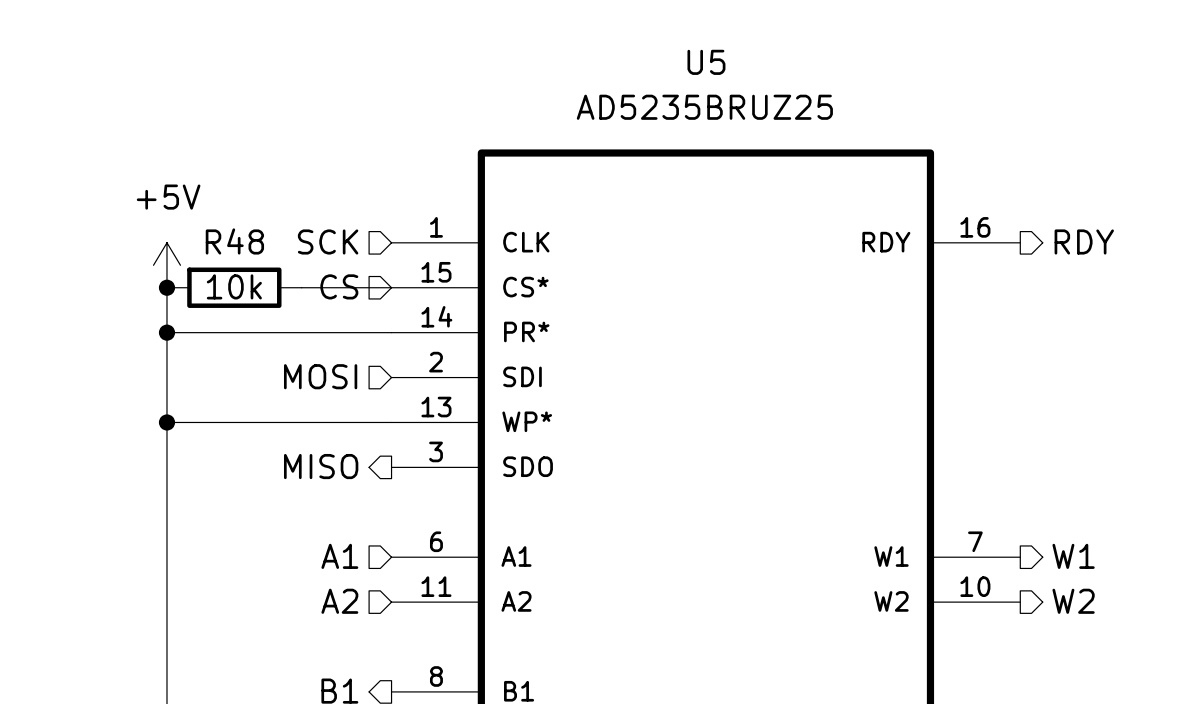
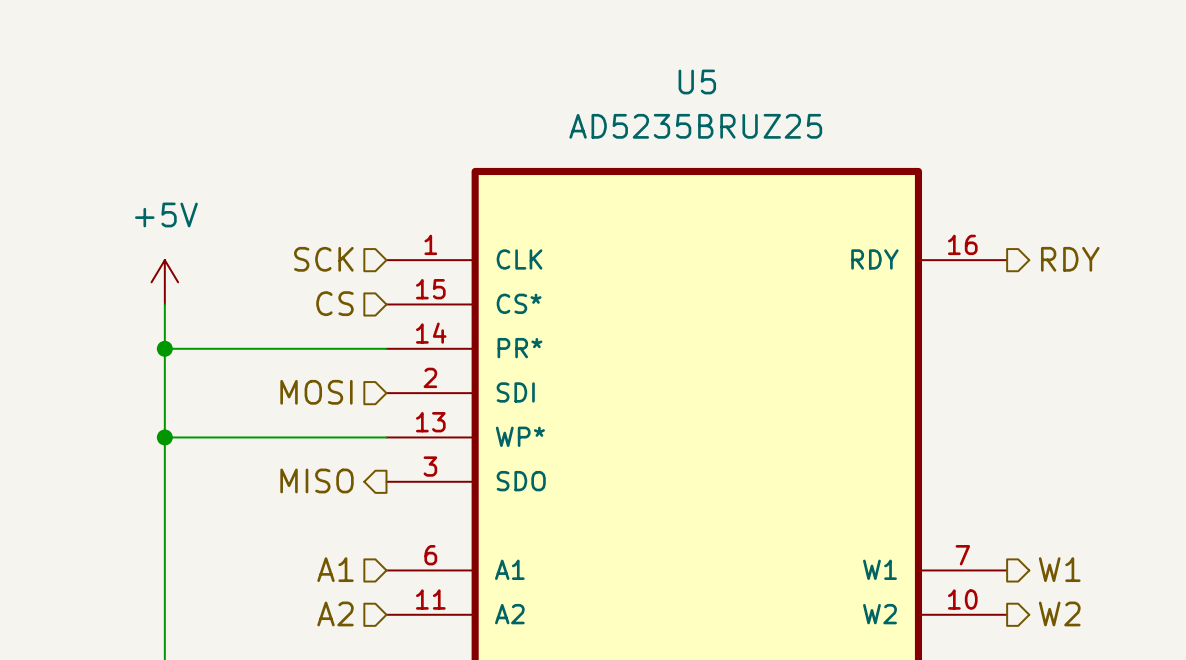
junction: (166, 287) -> none
R48: 10k (234, 287) -> none
wire: (301, 287) (391, 287) -> none

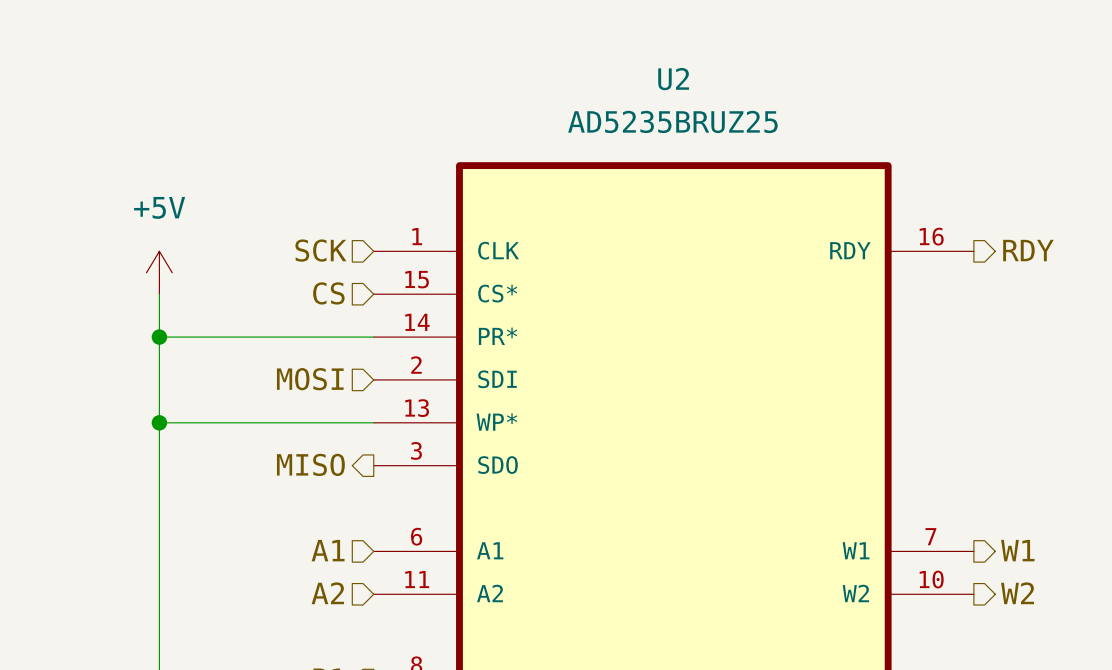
U5 name: U5 (697, 81) -> U2 (673, 79)

